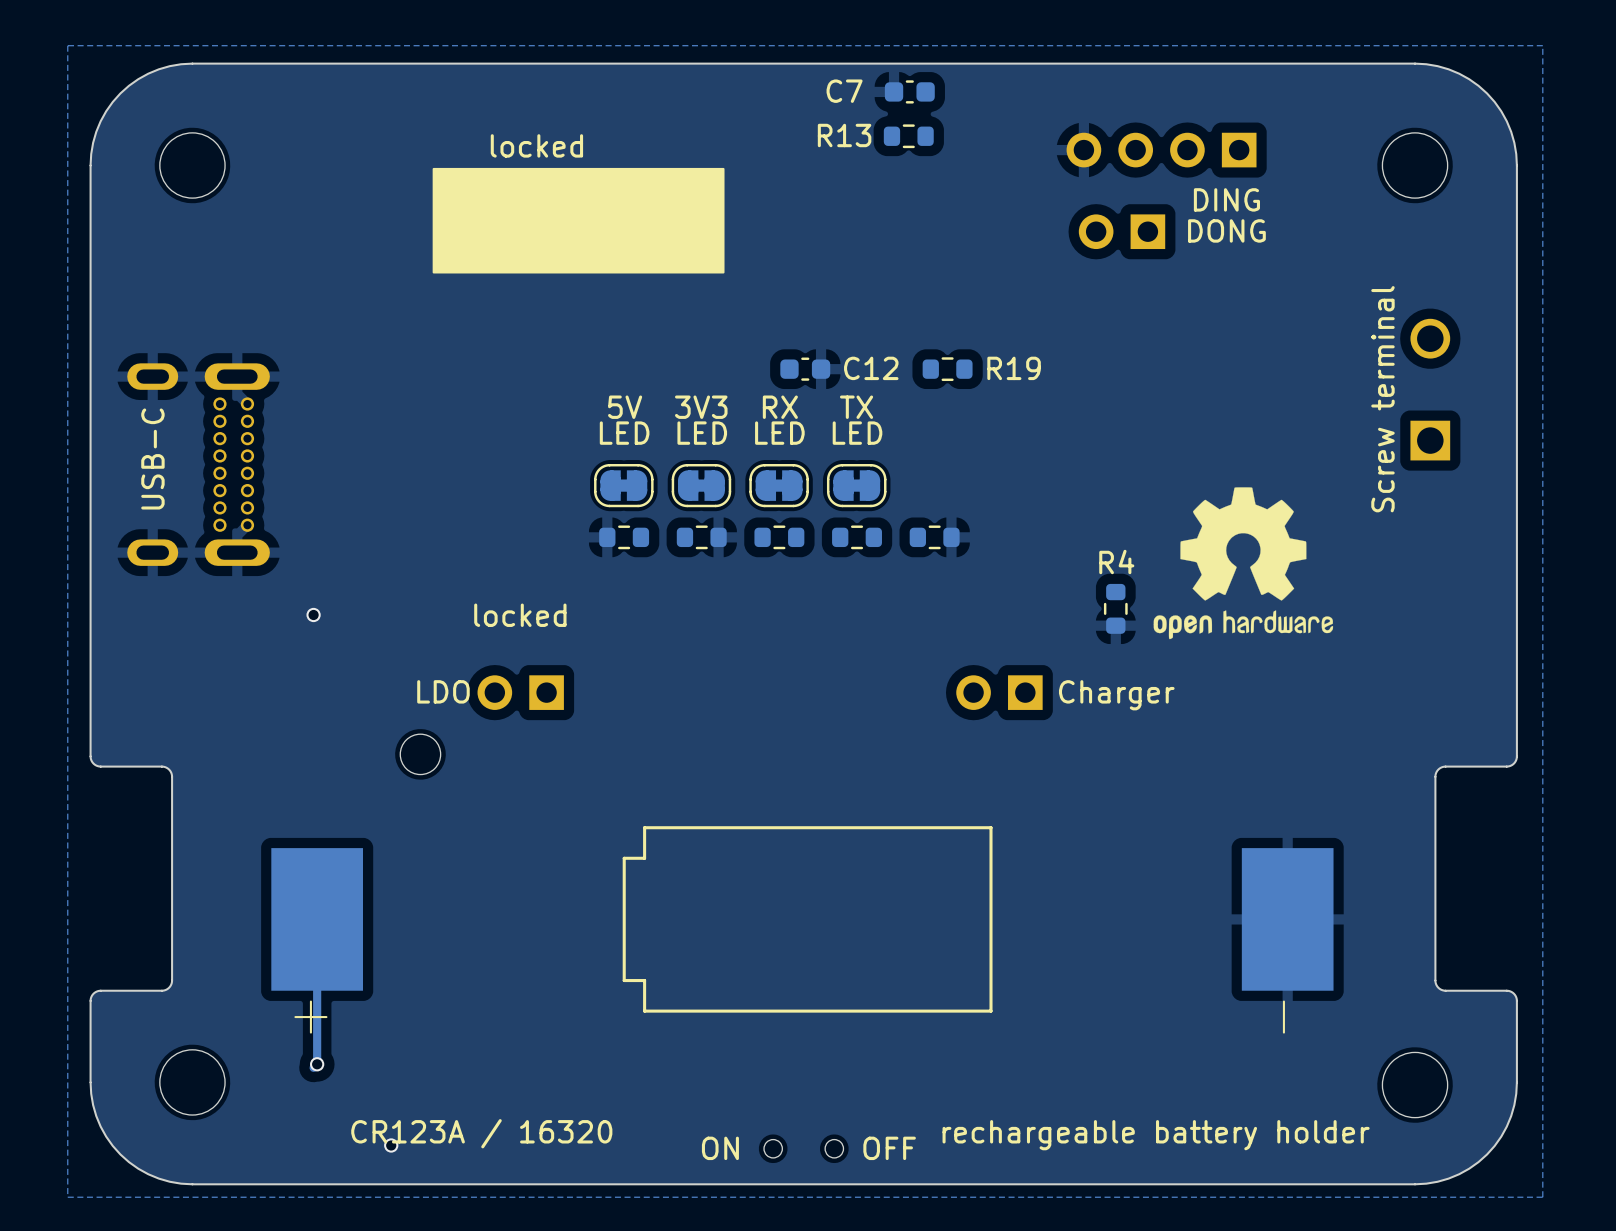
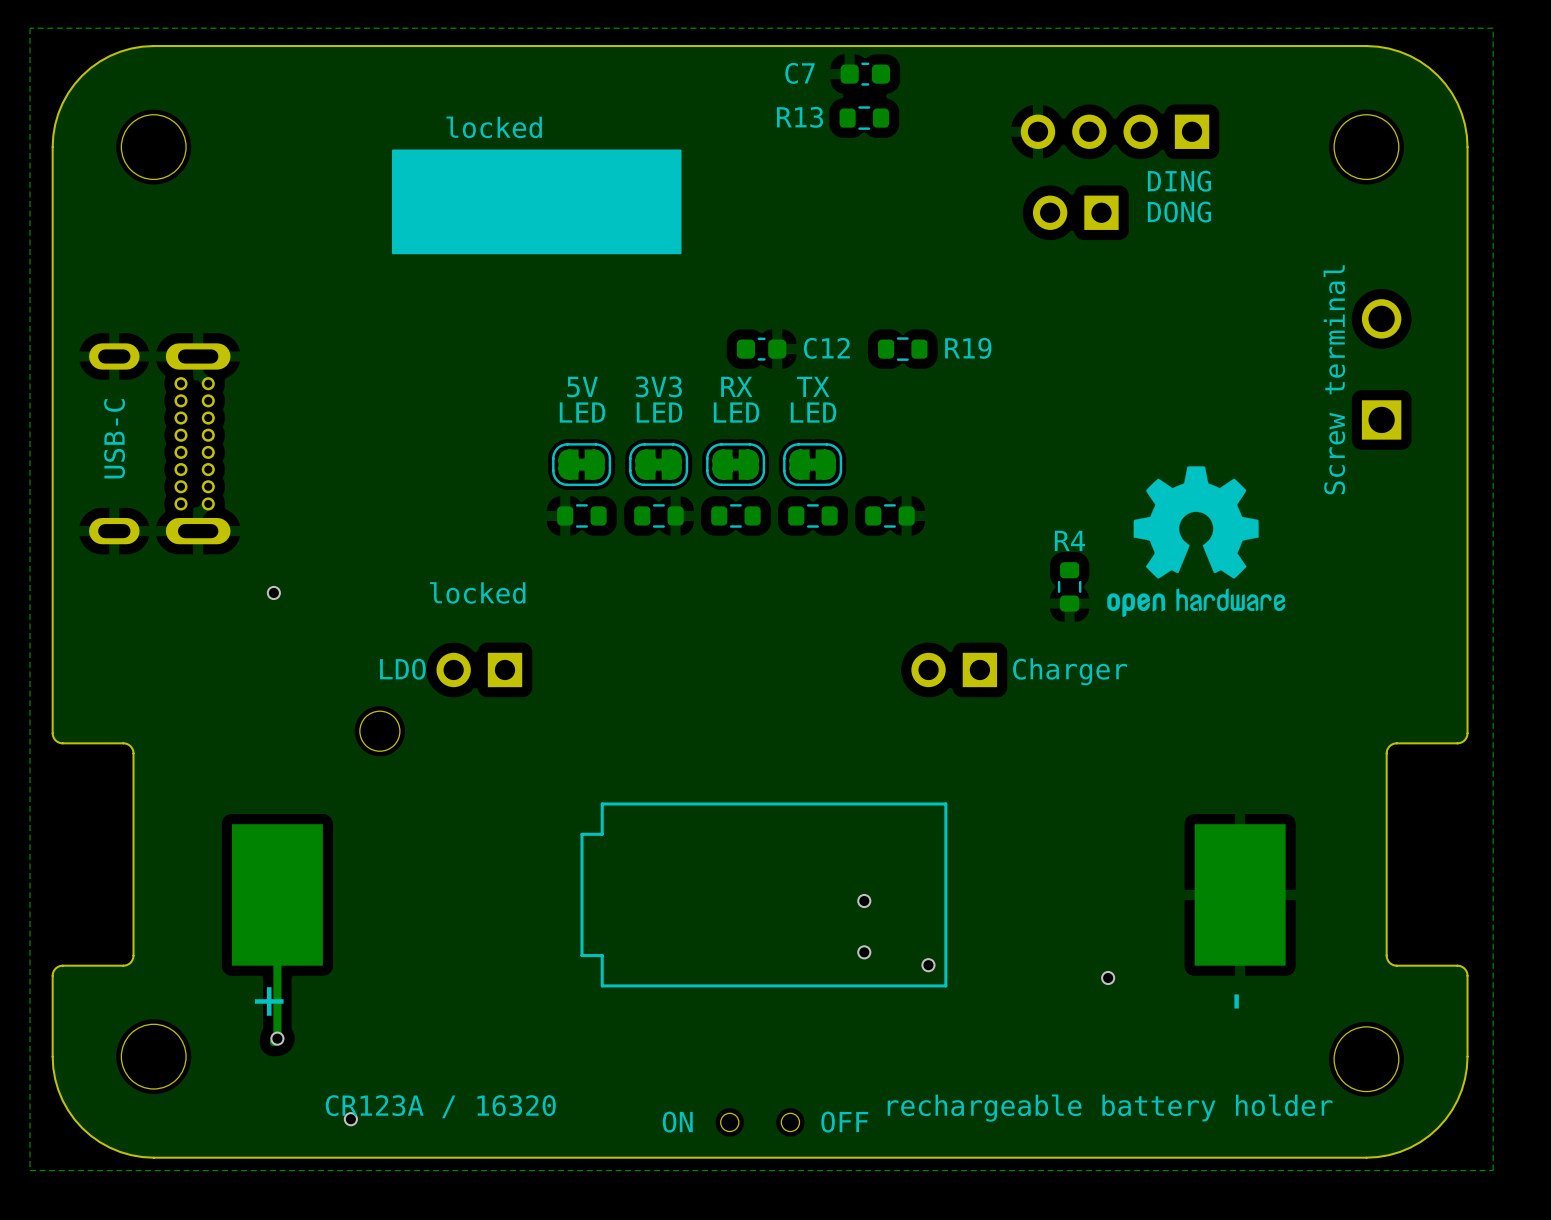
via: none -> (864, 901)
via: none -> (864, 952)
via: none -> (928, 965)
via: none -> (1108, 978)

